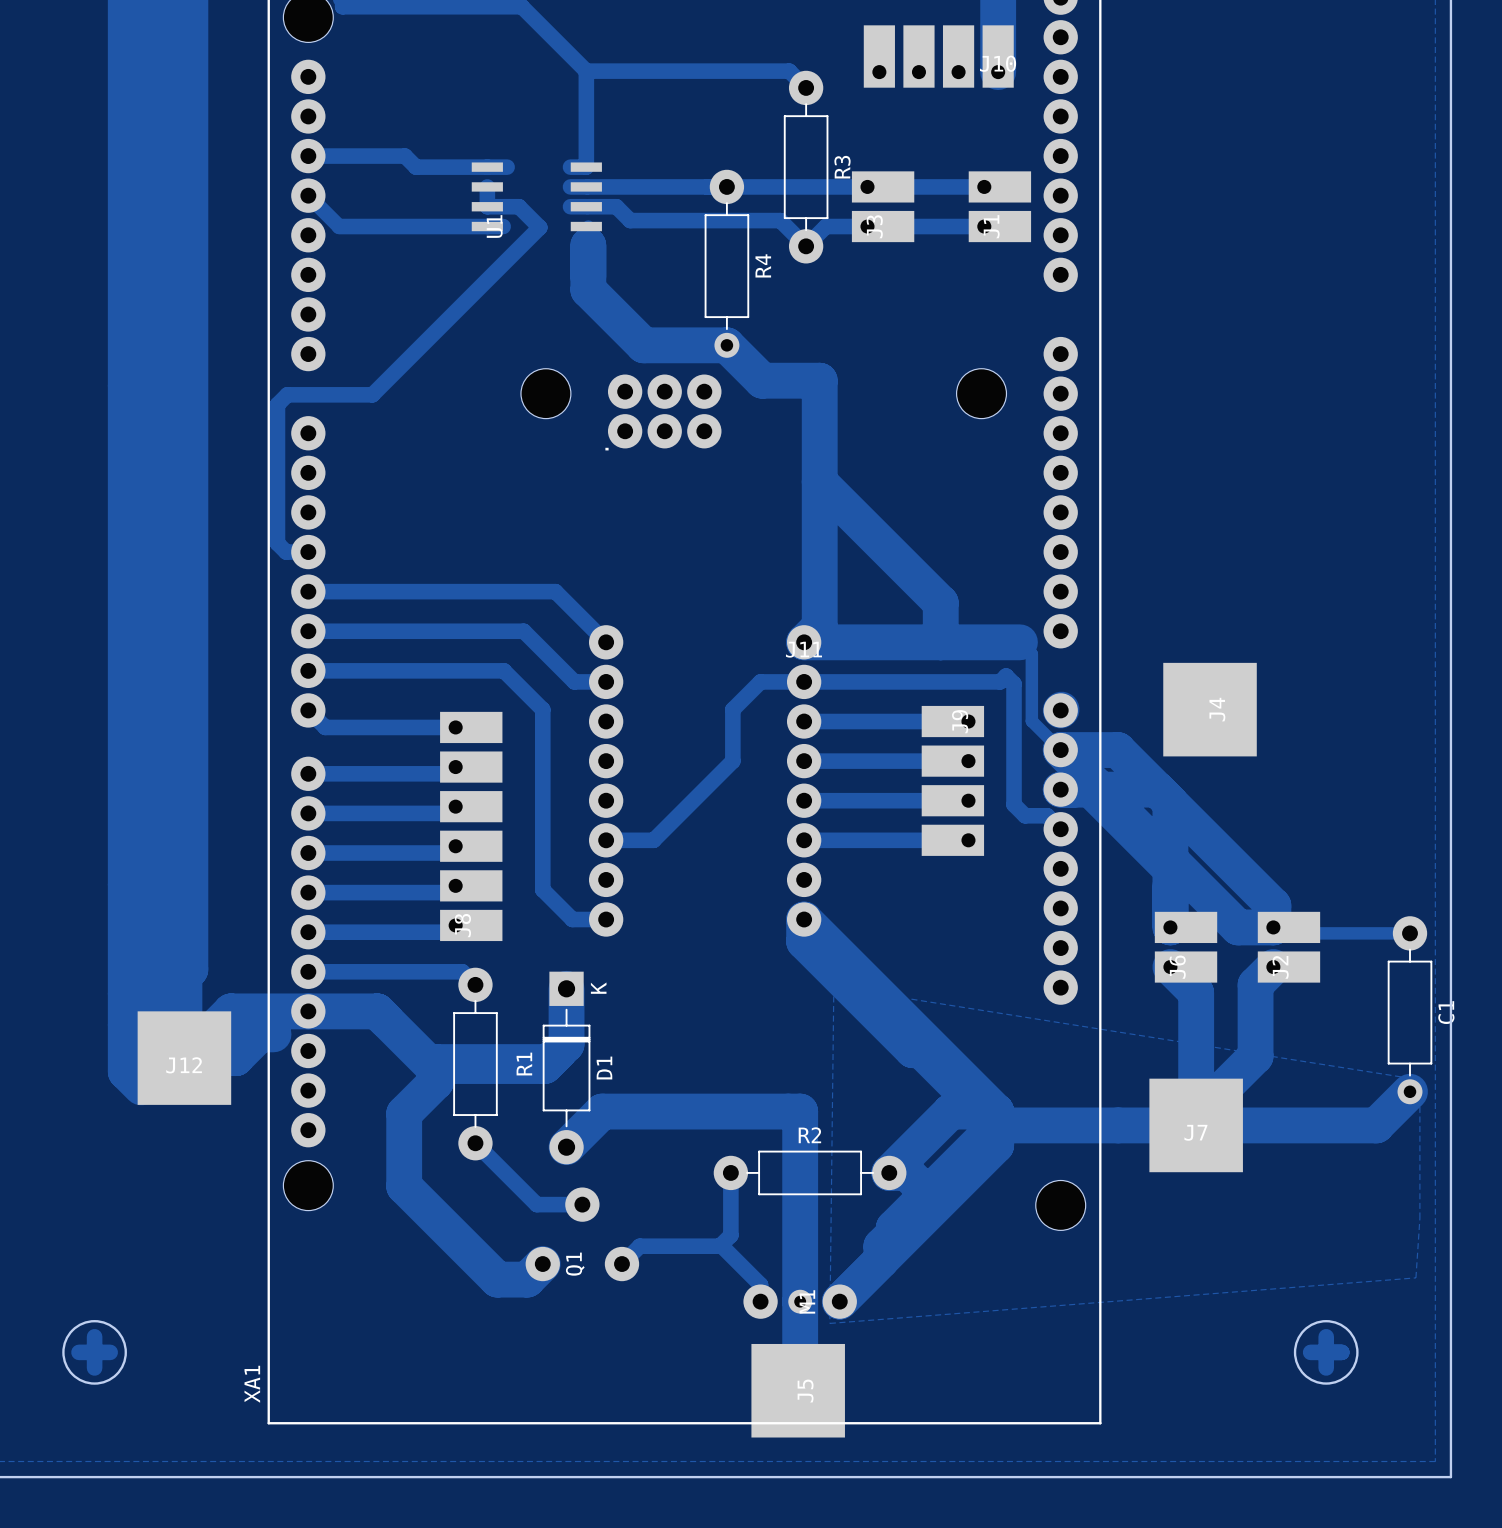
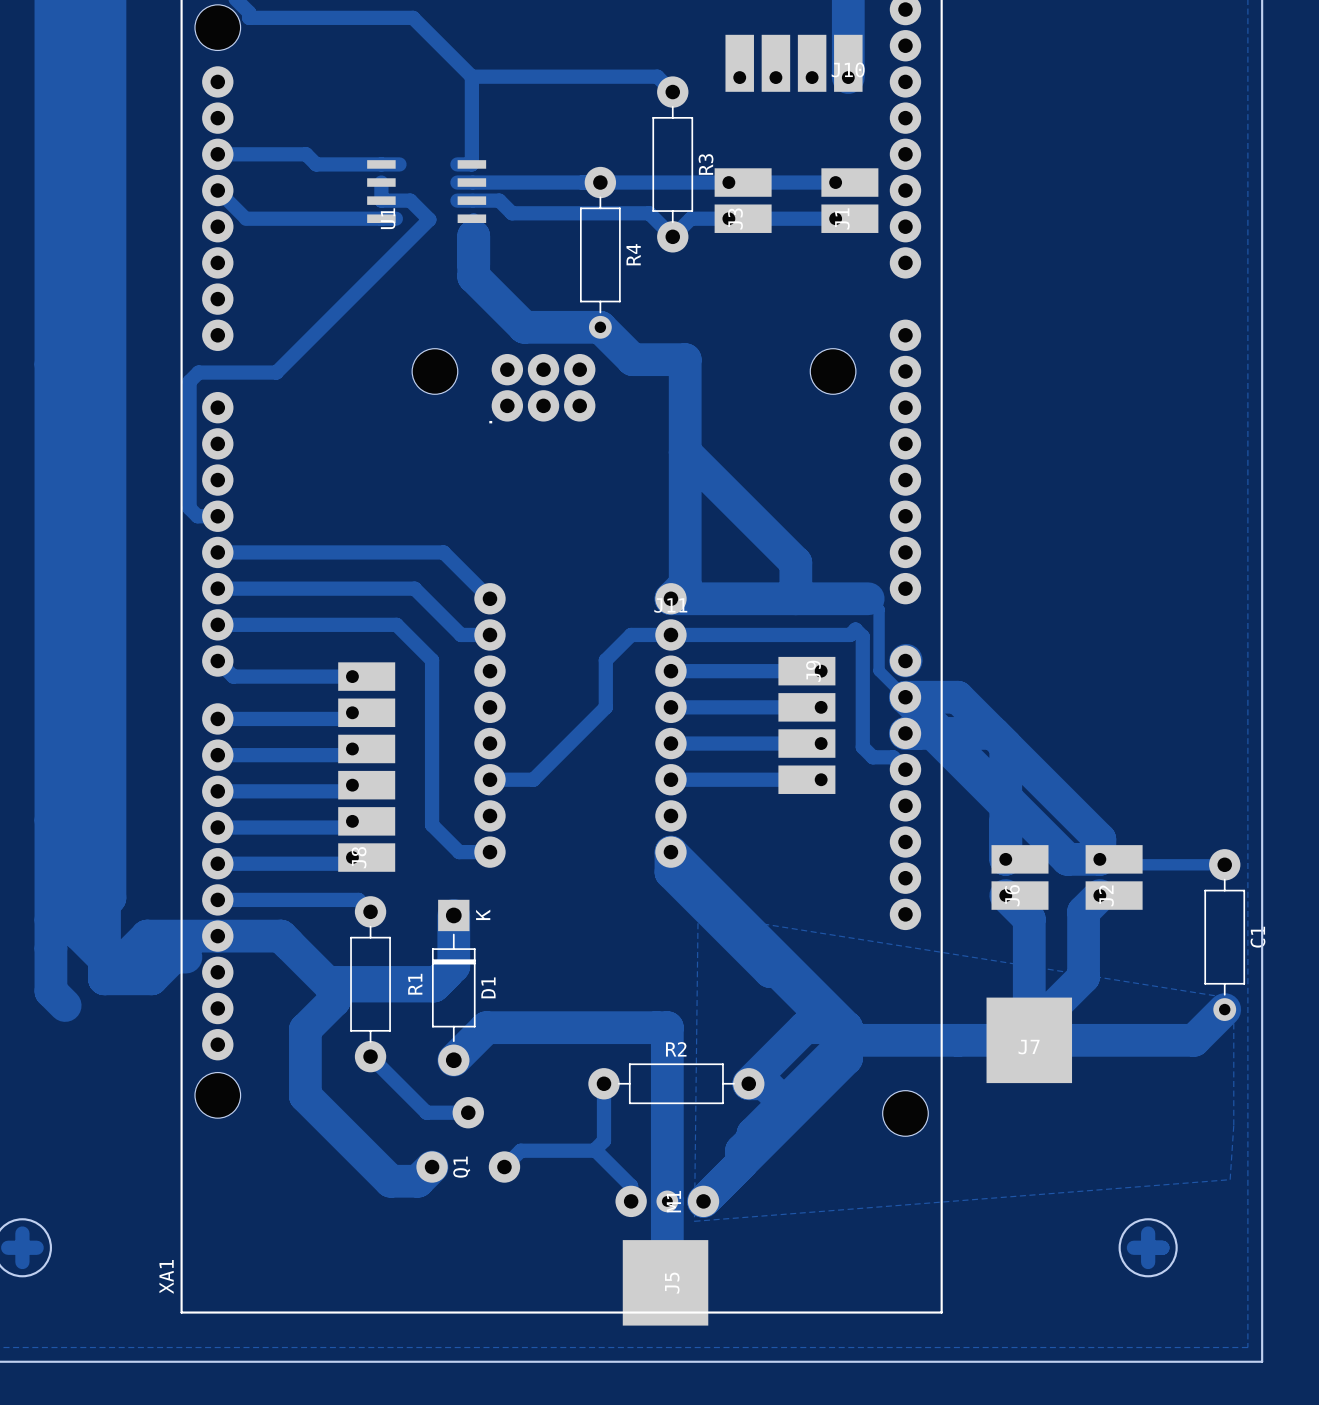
part: (1210, 709) -> none
part: (184, 1058) -> none

